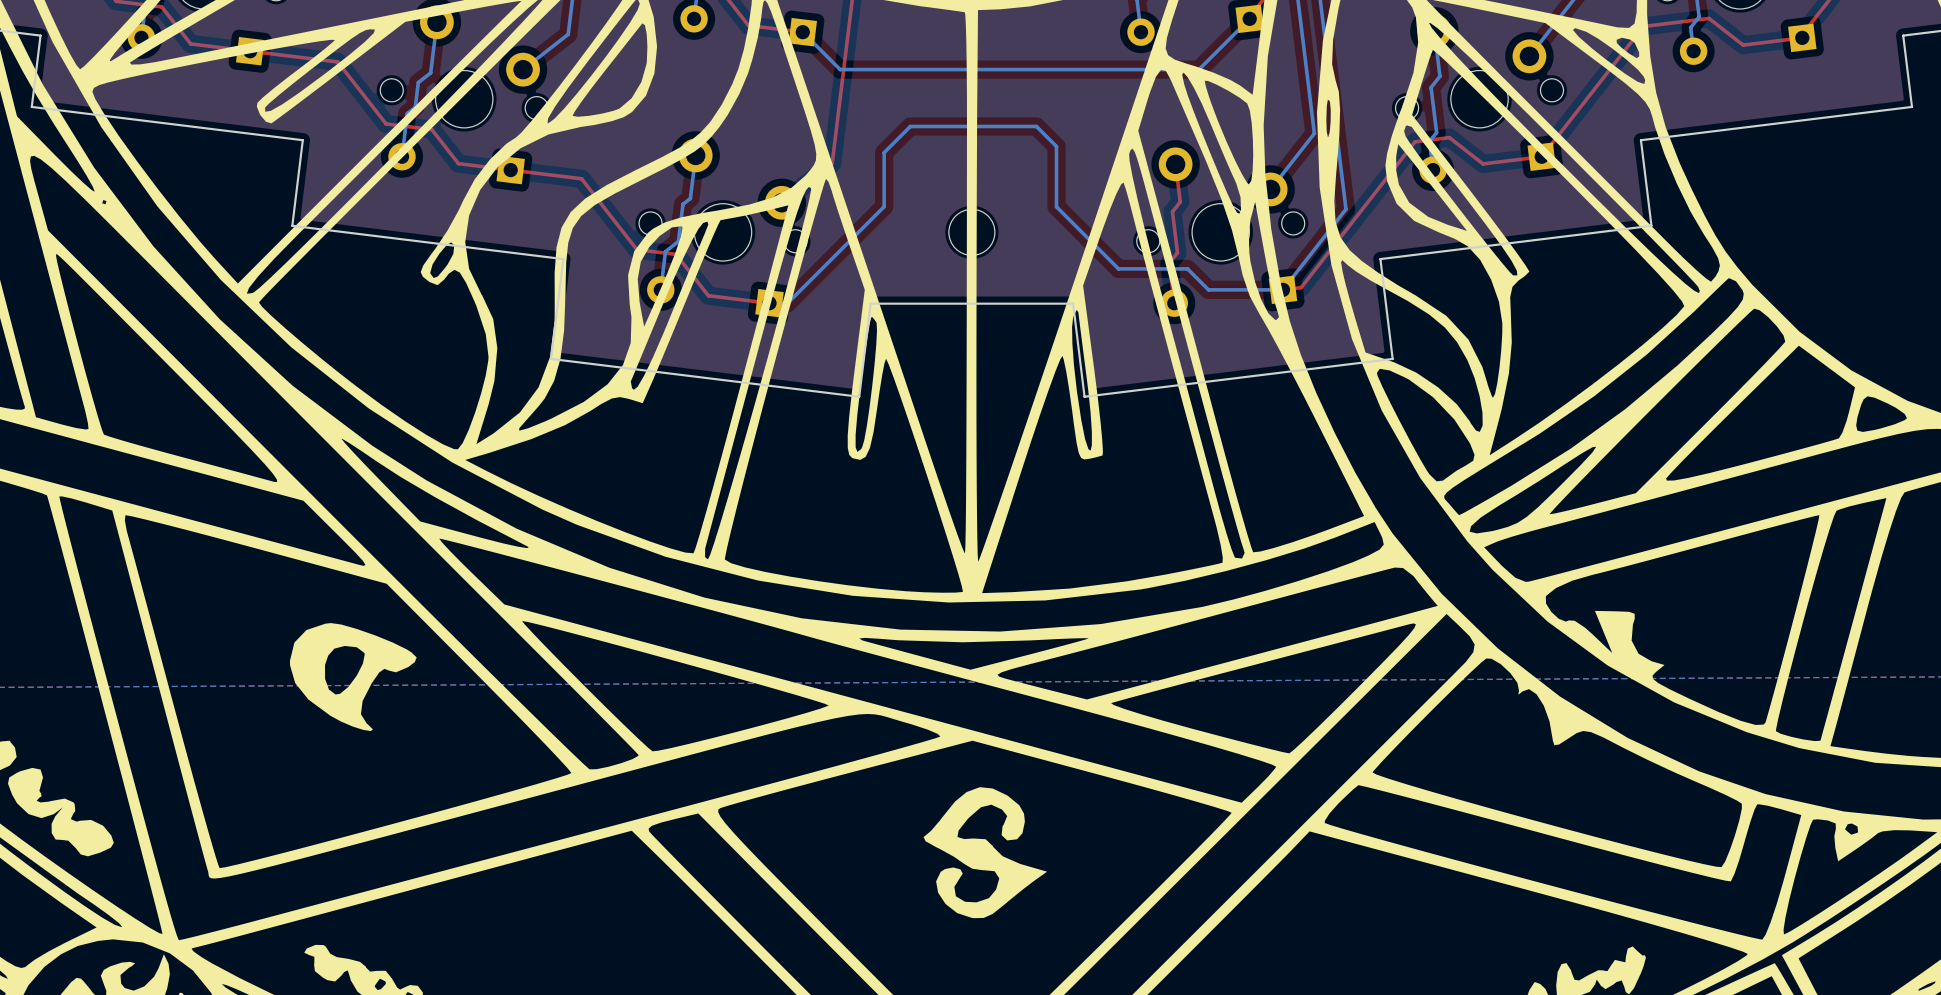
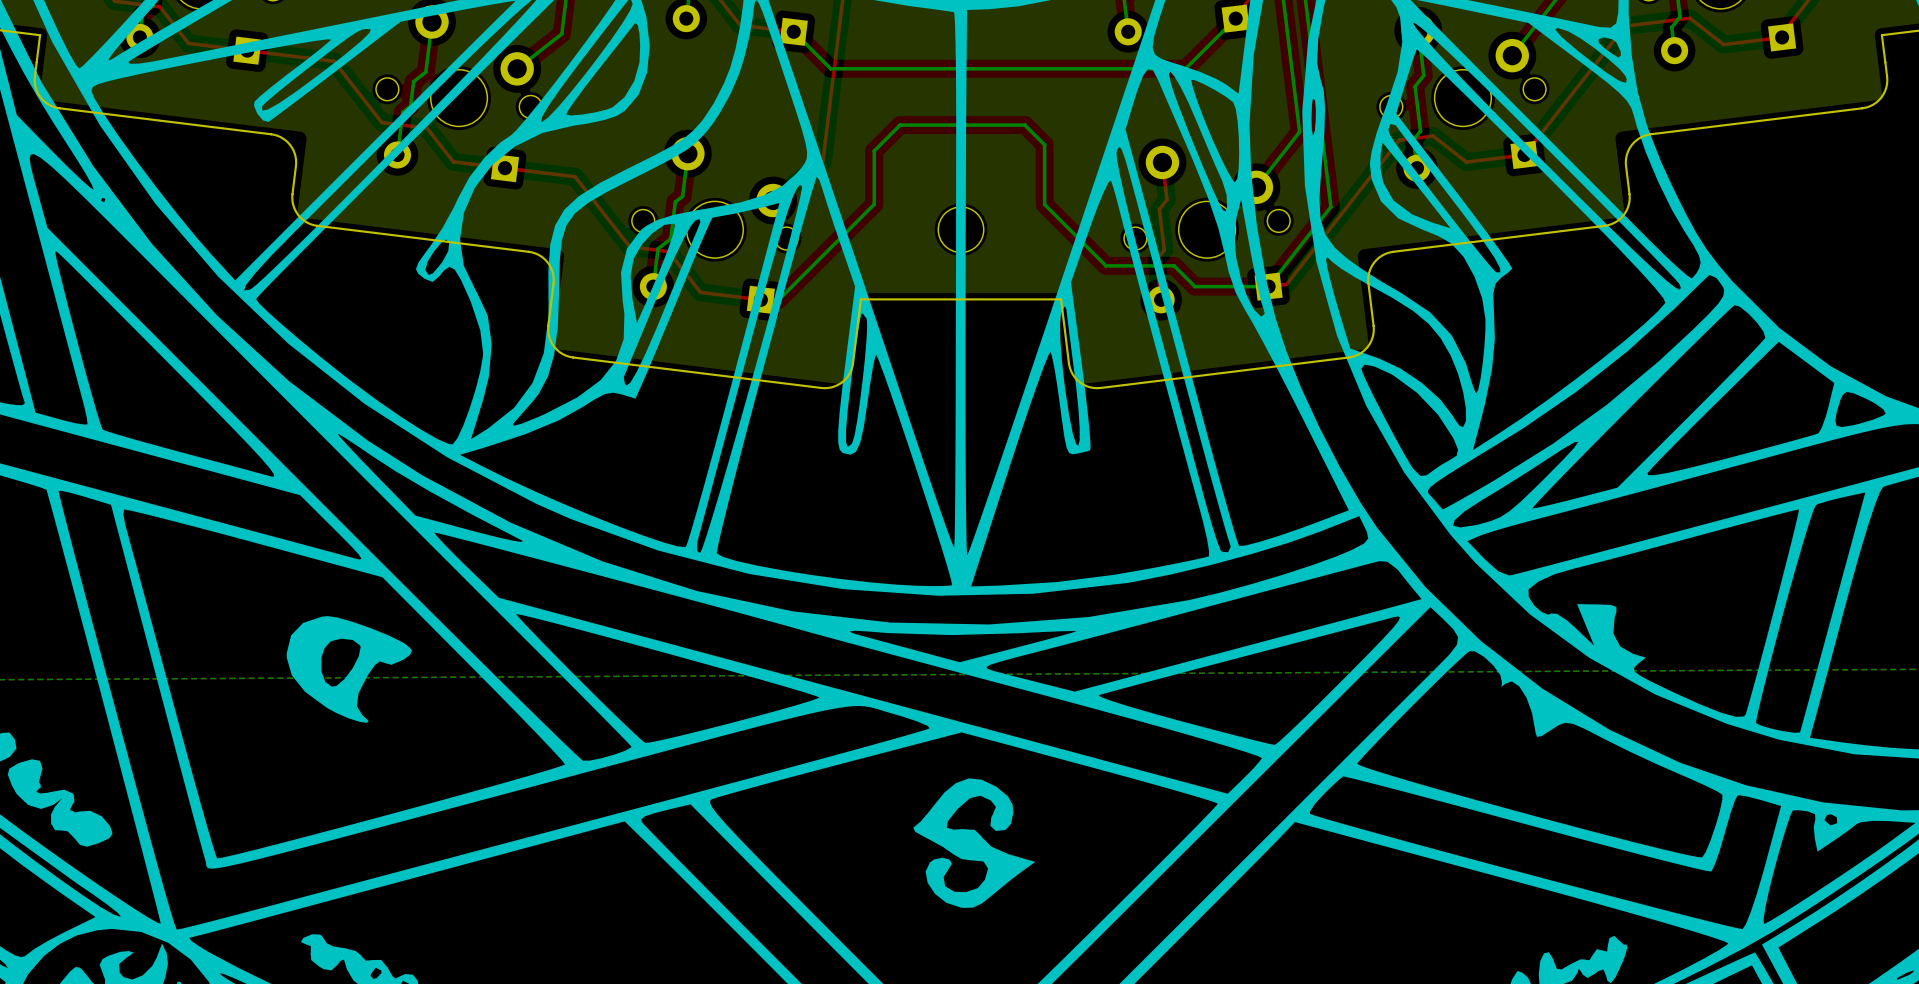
board edge: (1908, 77) (1911, 106) (1640, 140) (1651, 225) (1380, 259) (1392, 358) (1084, 396) (1073, 303) (870, 303) (859, 396) (551, 358) (563, 259) (292, 225) (302, 140) (31, 106) (35, 77) -> (1887, 76) (1883, 94) (1875, 102) (1866, 107) (1650, 134) (1641, 137) (1631, 145) (1626, 156) (1629, 197) (1628, 206) (1621, 217) (1610, 224) (1393, 251) (1382, 255) (1374, 262) (1368, 276) (1373, 335) (1367, 346) (1355, 356) (1097, 388) (1082, 383) (1075, 377) (1070, 369) (1061, 299) (860, 299) (851, 369) (842, 382) (827, 388) (569, 356) (556, 349) (549, 336) (548, 325) (553, 277) (547, 262) (537, 254) (528, 251) (311, 224) (300, 217) (293, 206) (292, 197) (295, 156) (290, 145) (280, 137) (271, 134) (56, 107) (47, 104) (38, 94) (35, 86) (34, 76)

